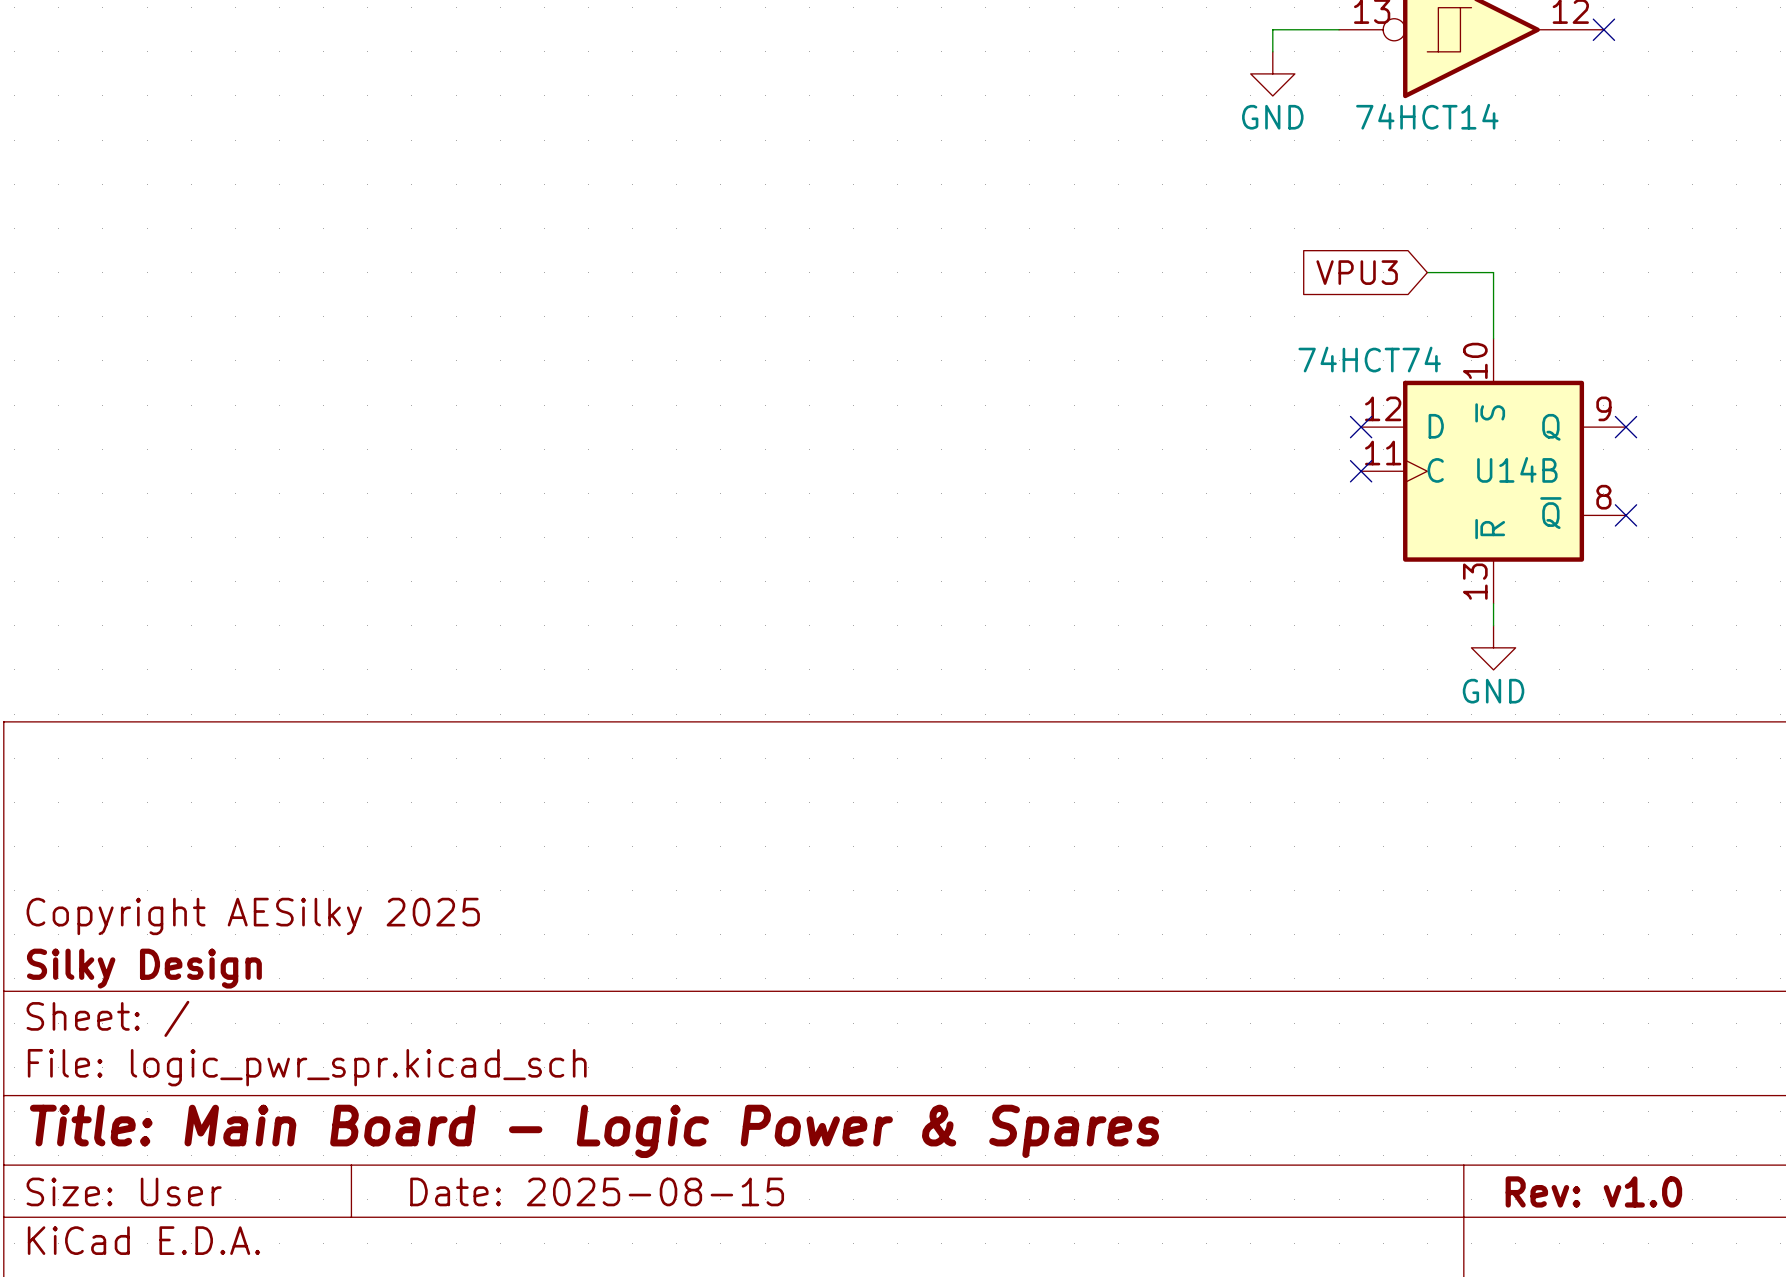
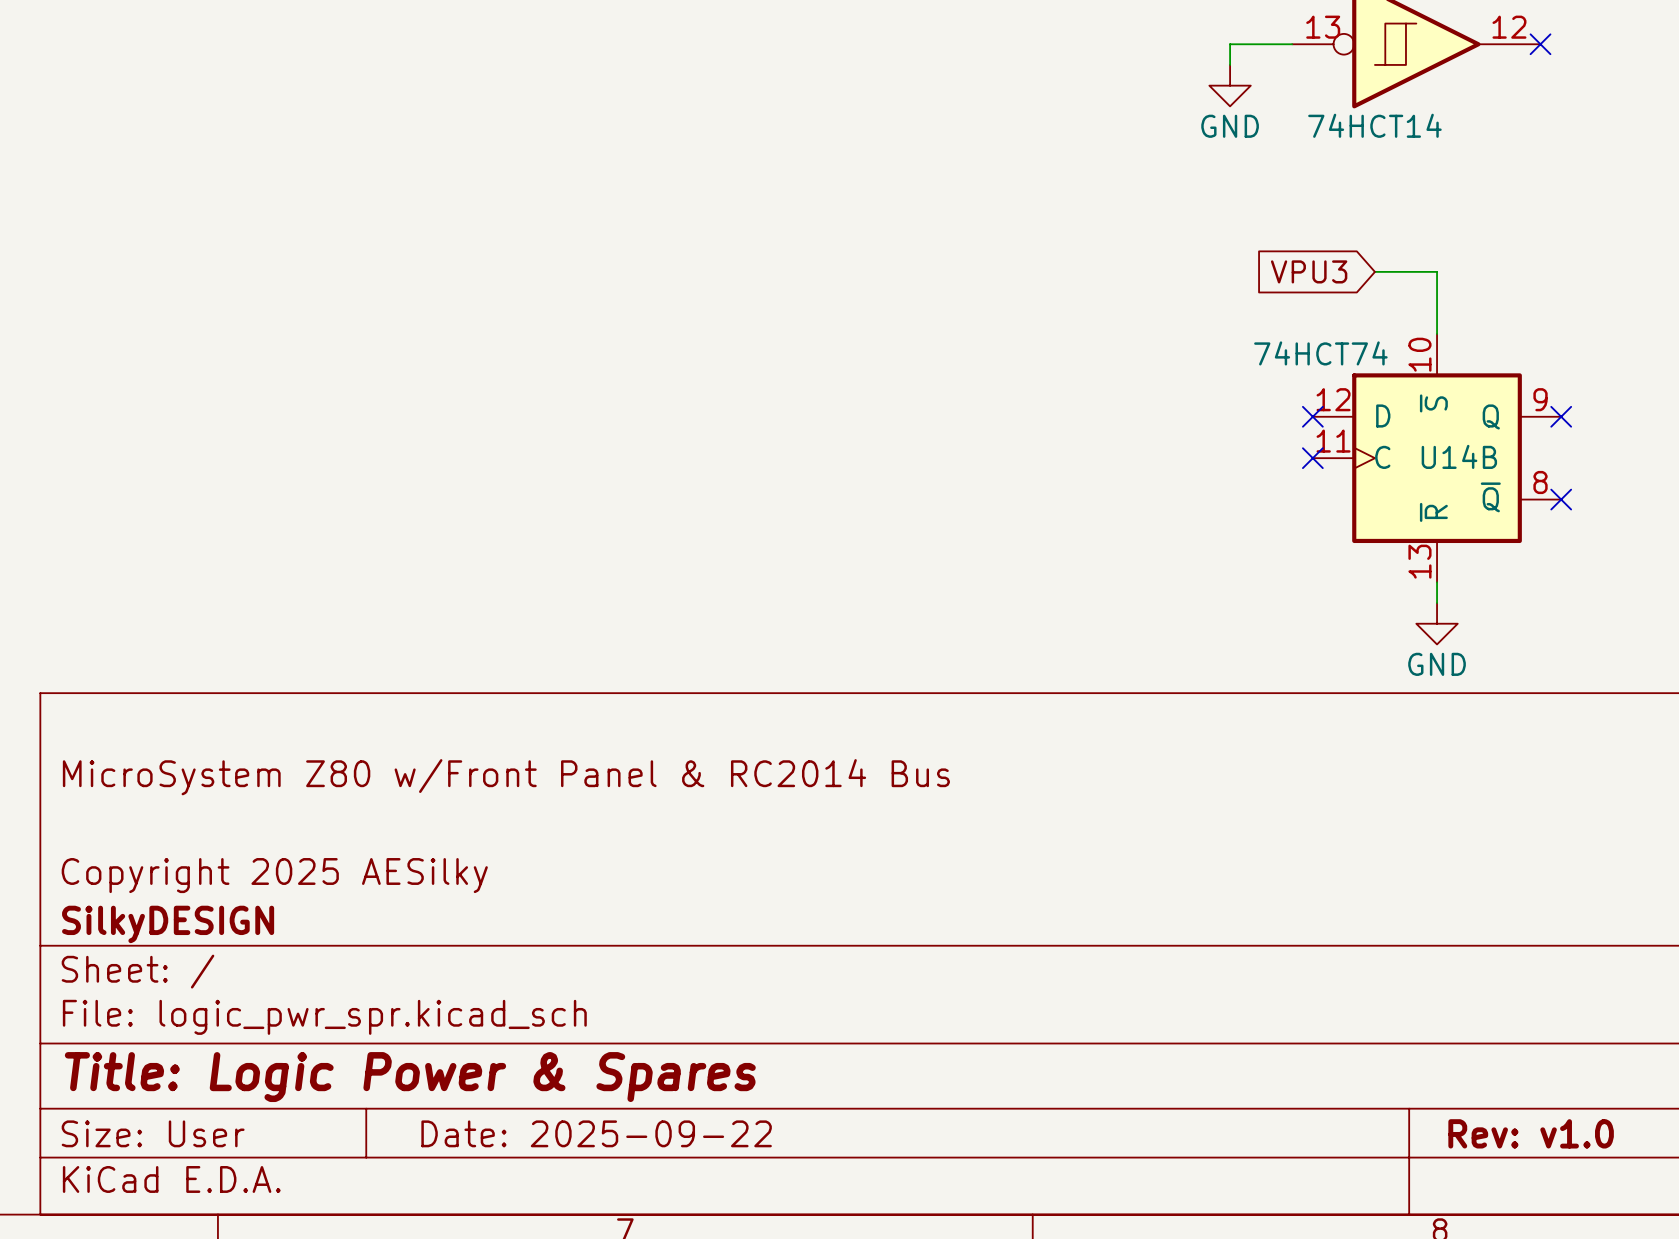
title block: none -> MicroSystem Z80 w/Front Panel & RC2014 Bus (506, 777)
title block: Copyright AESilky 2025 (253, 916) -> Copyright 2025 AESilky (274, 875)
title block: Silky Design (144, 968) -> SilkyDESIGN (168, 924)
title block: Title: Main Board - Logic Power & Spares (594, 1131) -> Title: Logic Power & Spares (410, 1077)
title block: Date: 2025-08-15 (597, 1191) -> Date: 2025-09-22 (596, 1133)

